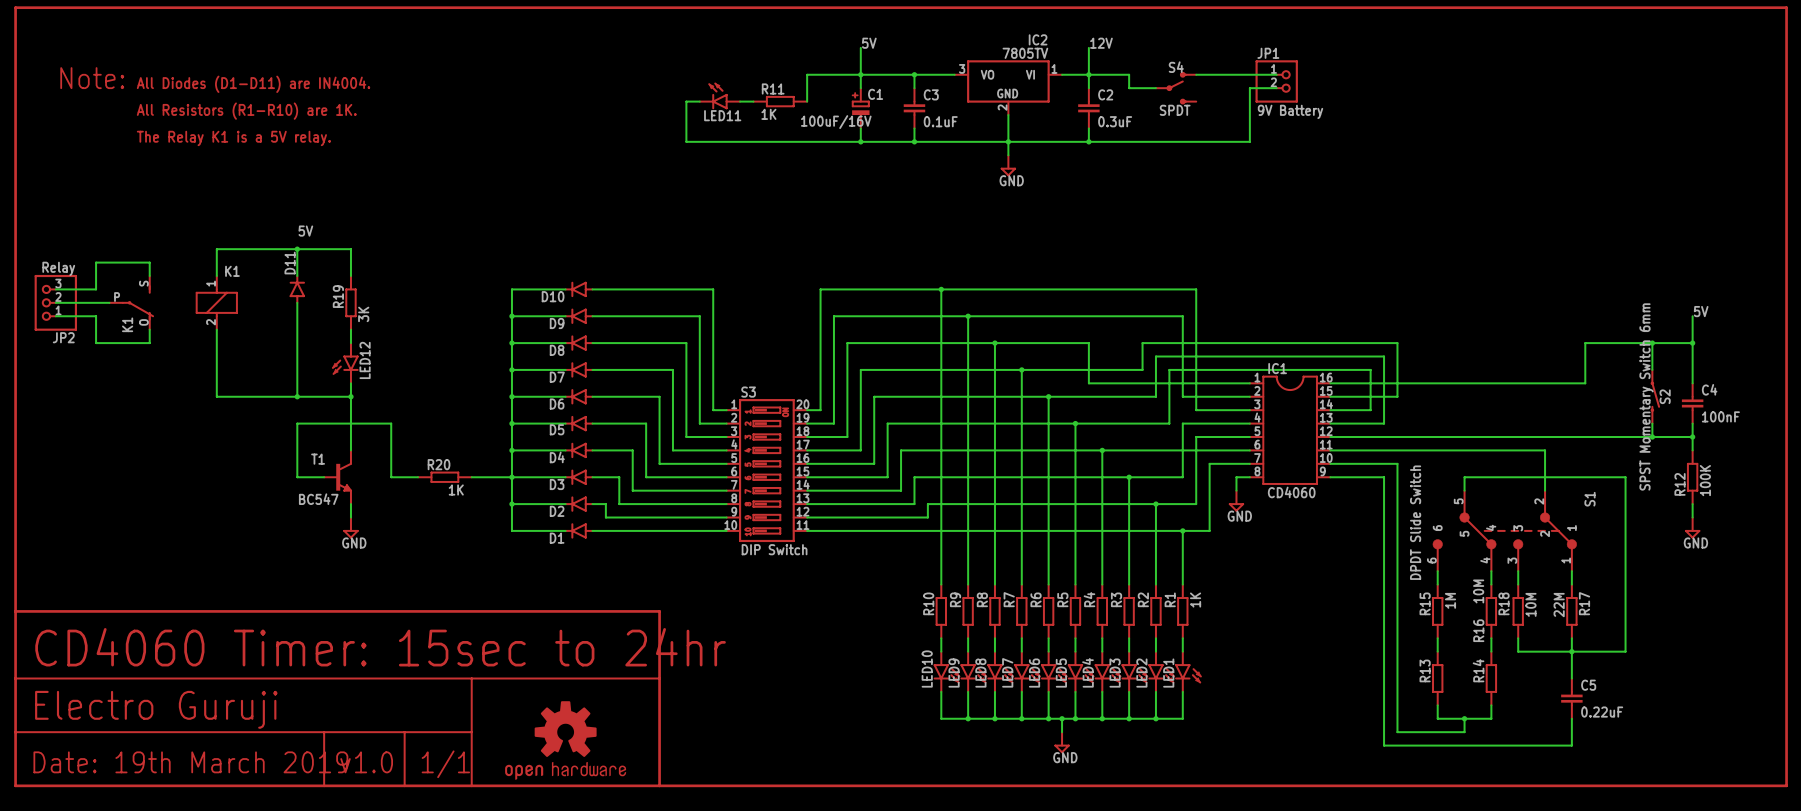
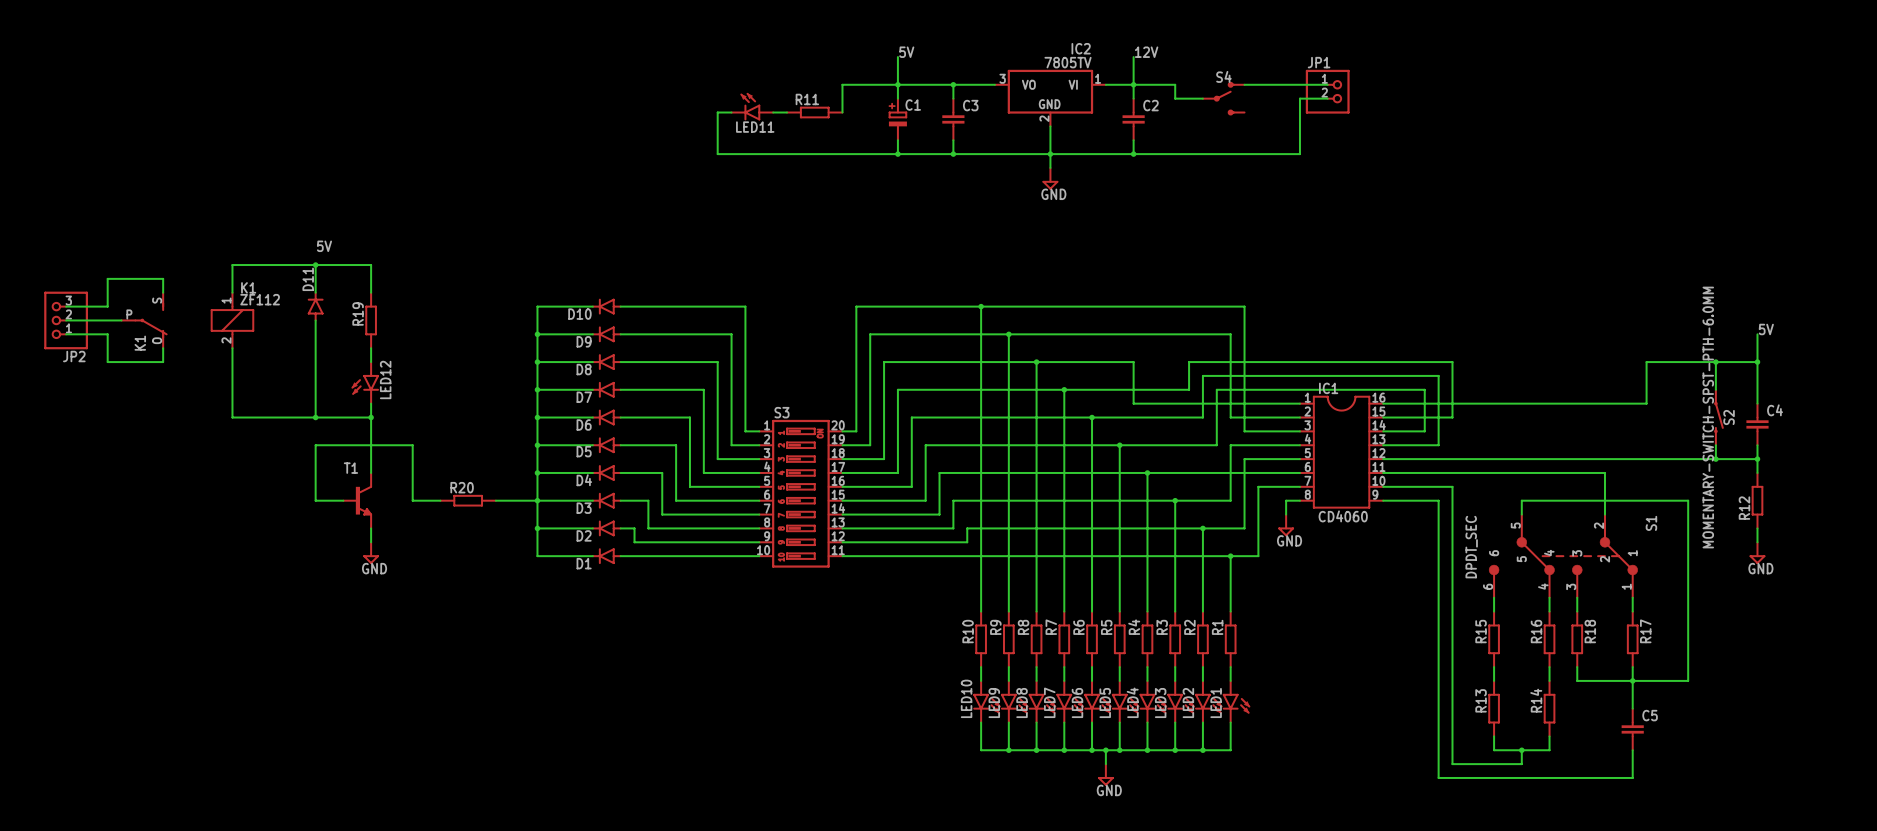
line: (15, 7) (15, 785) (1786, 785) (1786, 7) (15, 7) -> none
text: Note: (92, 78) -> none
text: All Diodes (D1-D11) are IN4004. (253, 84) -> none
S4 value: SPDT (1175, 110) -> none
text: All Resistors (R1-R10) are 1K. (246, 111) -> none
JP1 value: 9V Battery (1290, 111) -> none
R11 value: 1K (768, 114) -> none
C3 value: 0.1uF (940, 121) -> none
C2 value: 0.3uF (1115, 121) -> none
C1 value: 100uF/16V (836, 122) -> none
text: The Relay K1 is a 5V relay. (233, 138) -> none
JP2 value: Relay (58, 268) -> none
K1 value: none -> ZF112 (260, 299)
R19 value: 3K (363, 314) -> none
S2 value: SPST Momentary Switch 6mm (1646, 396) -> MOMENTARY-SWITCH-SPST-PTH-6.0MM (1708, 417)
C4 value: 100nF (1720, 416) -> none
T1 name position: T1 (318, 459) -> T1 (350, 468)
R12 value: 100K (1705, 480) -> none
R20 value: 1K (456, 490) -> none
T1 value: BC547 (318, 499) -> none
S1 value: DPDT Slide Switch (1415, 522) -> DPDT_SEC (1471, 547)
S3 value: DIP Switch (774, 549) -> none
R18 value: 10M (1478, 591) -> none
R1 value: 1K (1195, 600) -> none
R15 value: 1M (1450, 600) -> none
R18 name position: R18 (1503, 603) -> R18 (1590, 631)
R16 value: 10M (1530, 604) -> none
R17 value: 22M (1559, 605) -> none
line: (15, 611) (659, 611) (659, 785) -> none
R16 name position: R16 (1478, 630) -> R16 (1536, 631)
text: CD4060 Timer: 15sec to 24hr (380, 647) -> none
line: (15, 678) (659, 678) -> none
line: (471, 678) (471, 785) -> none
text: Electro Guruji (156, 709) -> none
C5 value: 0.22uF (1602, 712) -> none
line: (15, 732) (471, 732) -> none
line: (324, 732) (324, 785) -> none
line: (404, 732) (404, 785) -> none
part: (565, 740) -> none
text: Date: 19th March 2019 (190, 762) -> none
text: v1.0 (366, 762) -> none
text: 1/1 (445, 764) -> none

